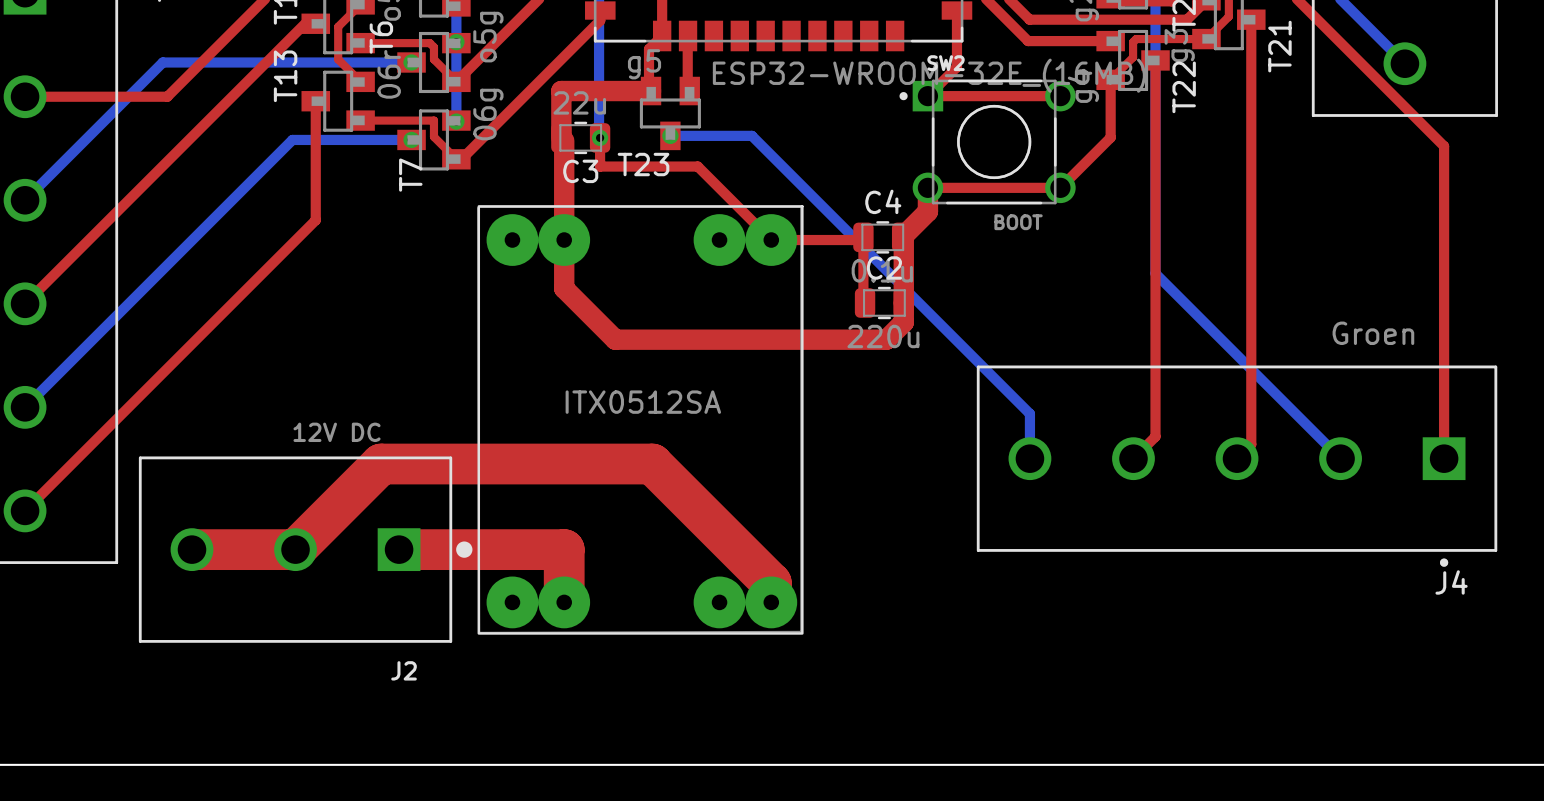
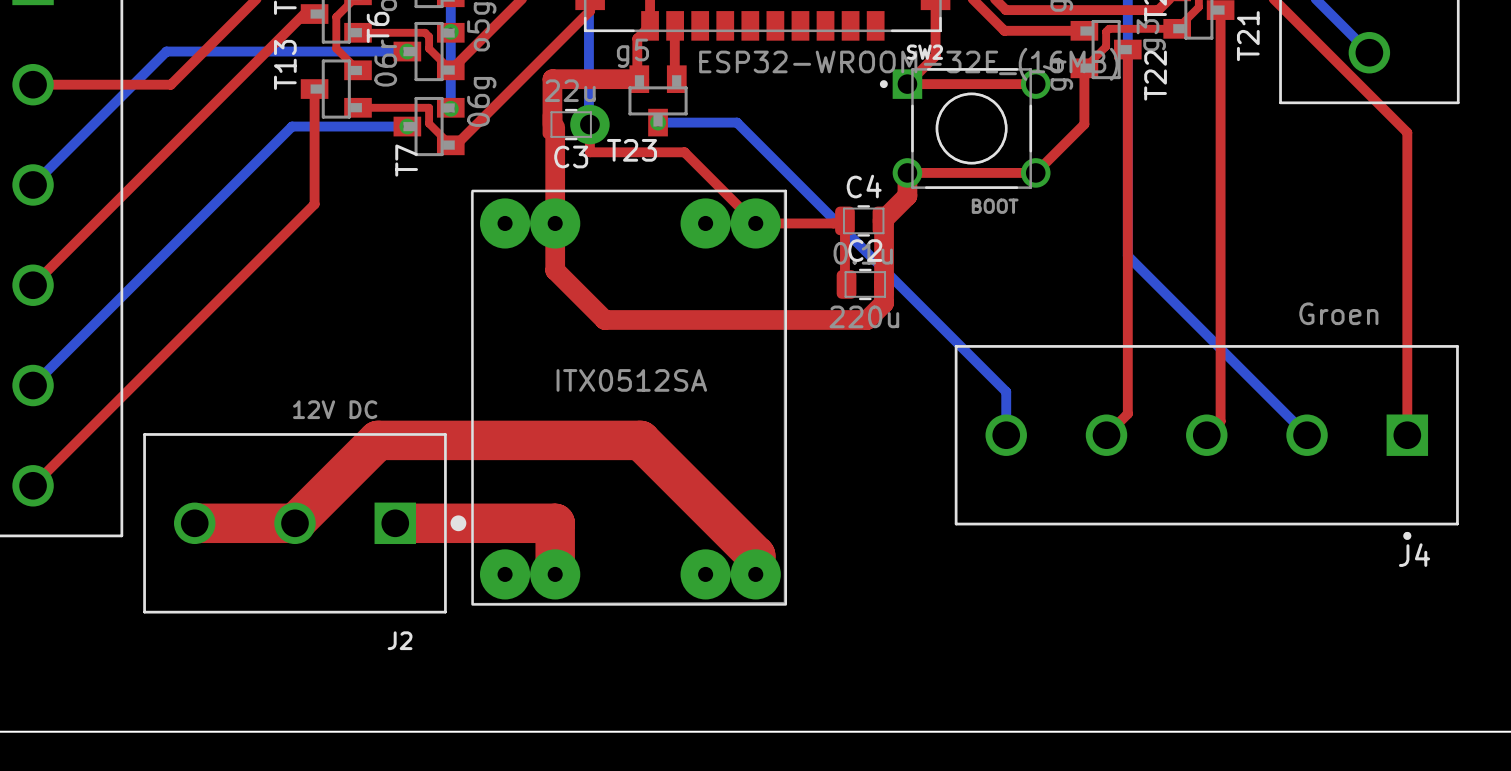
via size: [591, 129, 609, 147] -> [570, 104, 610, 145]

